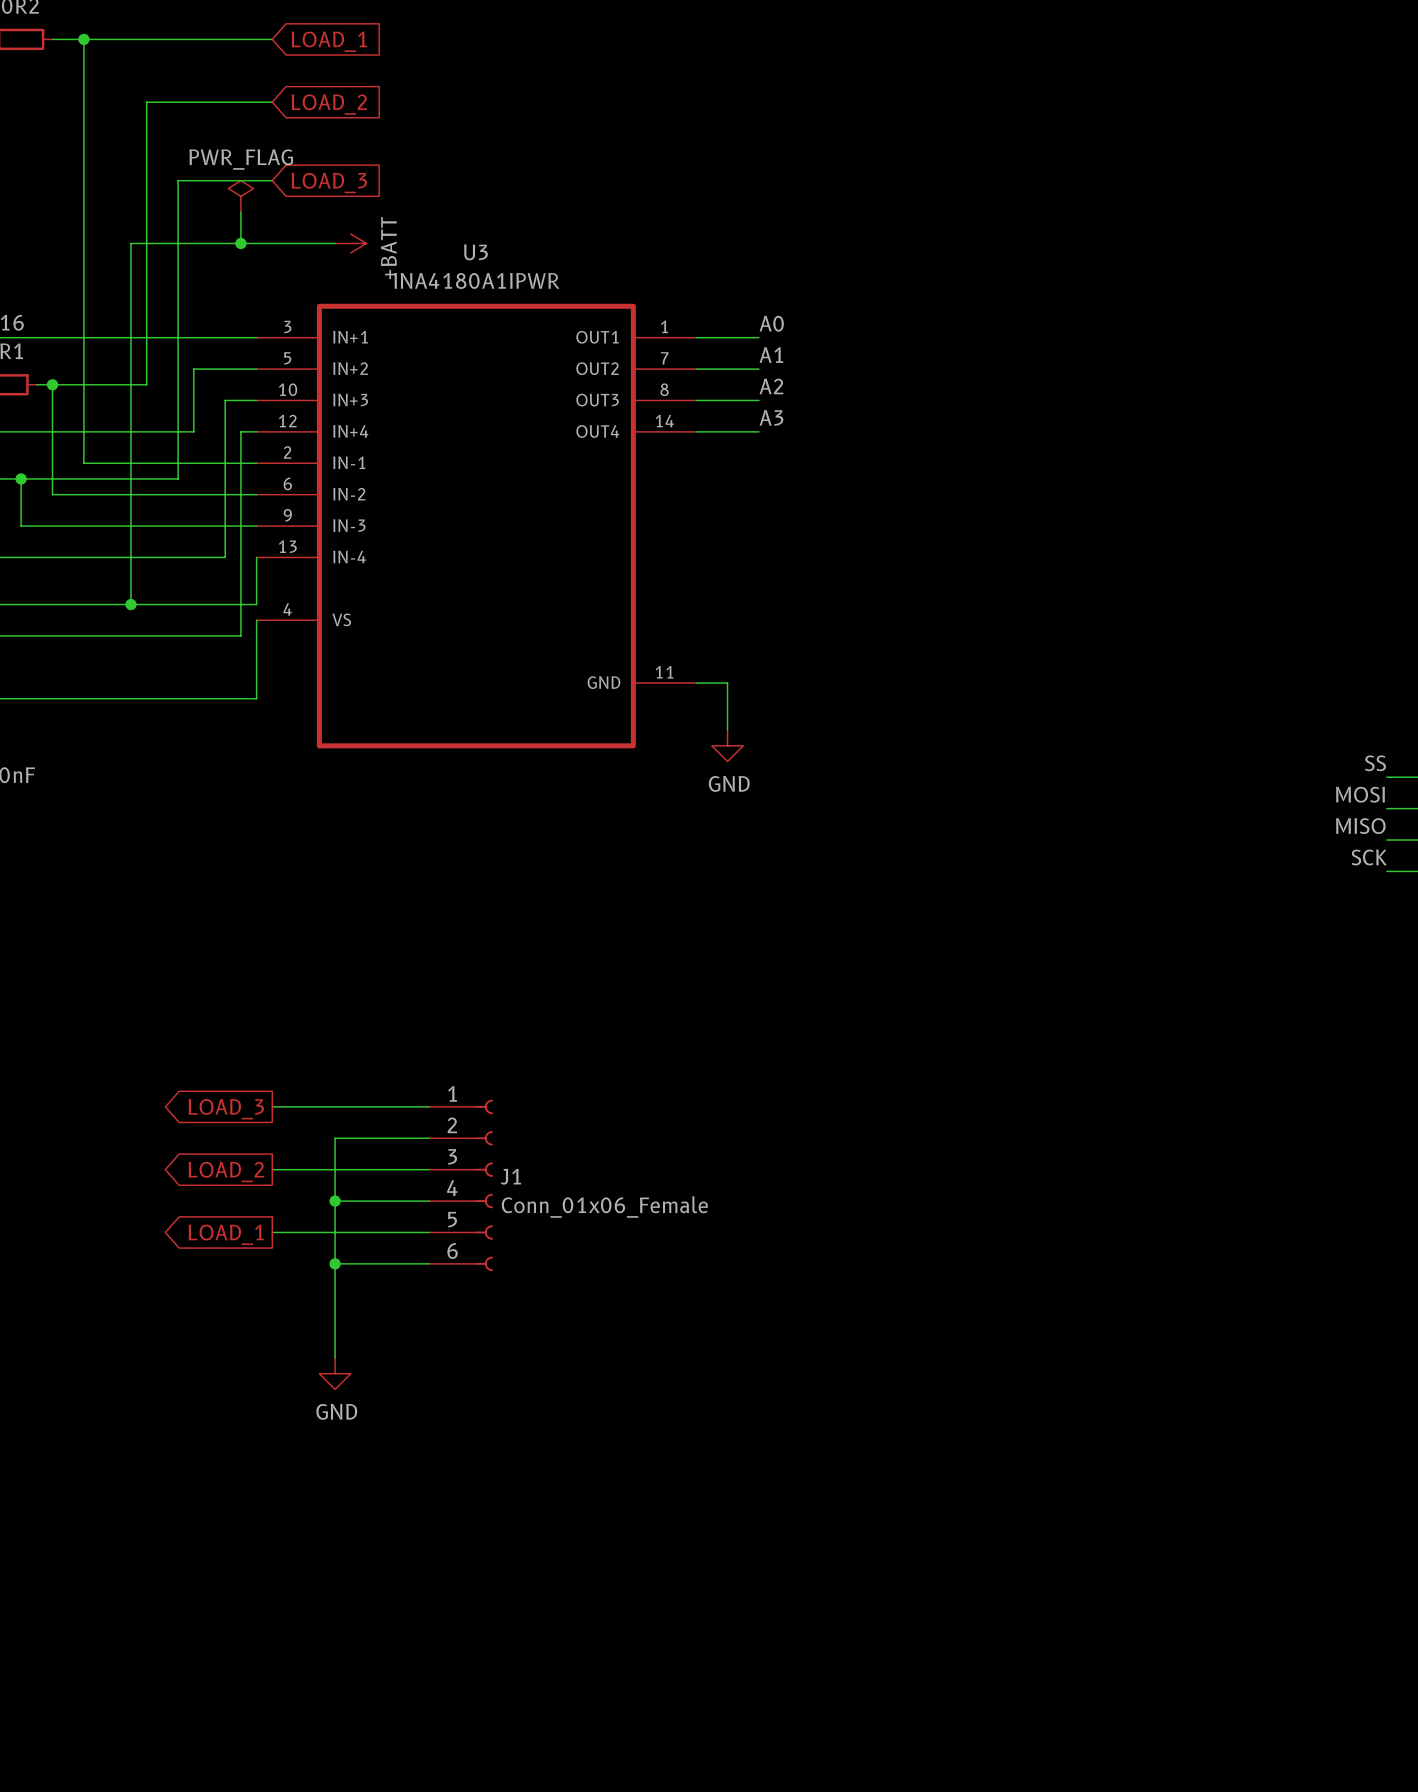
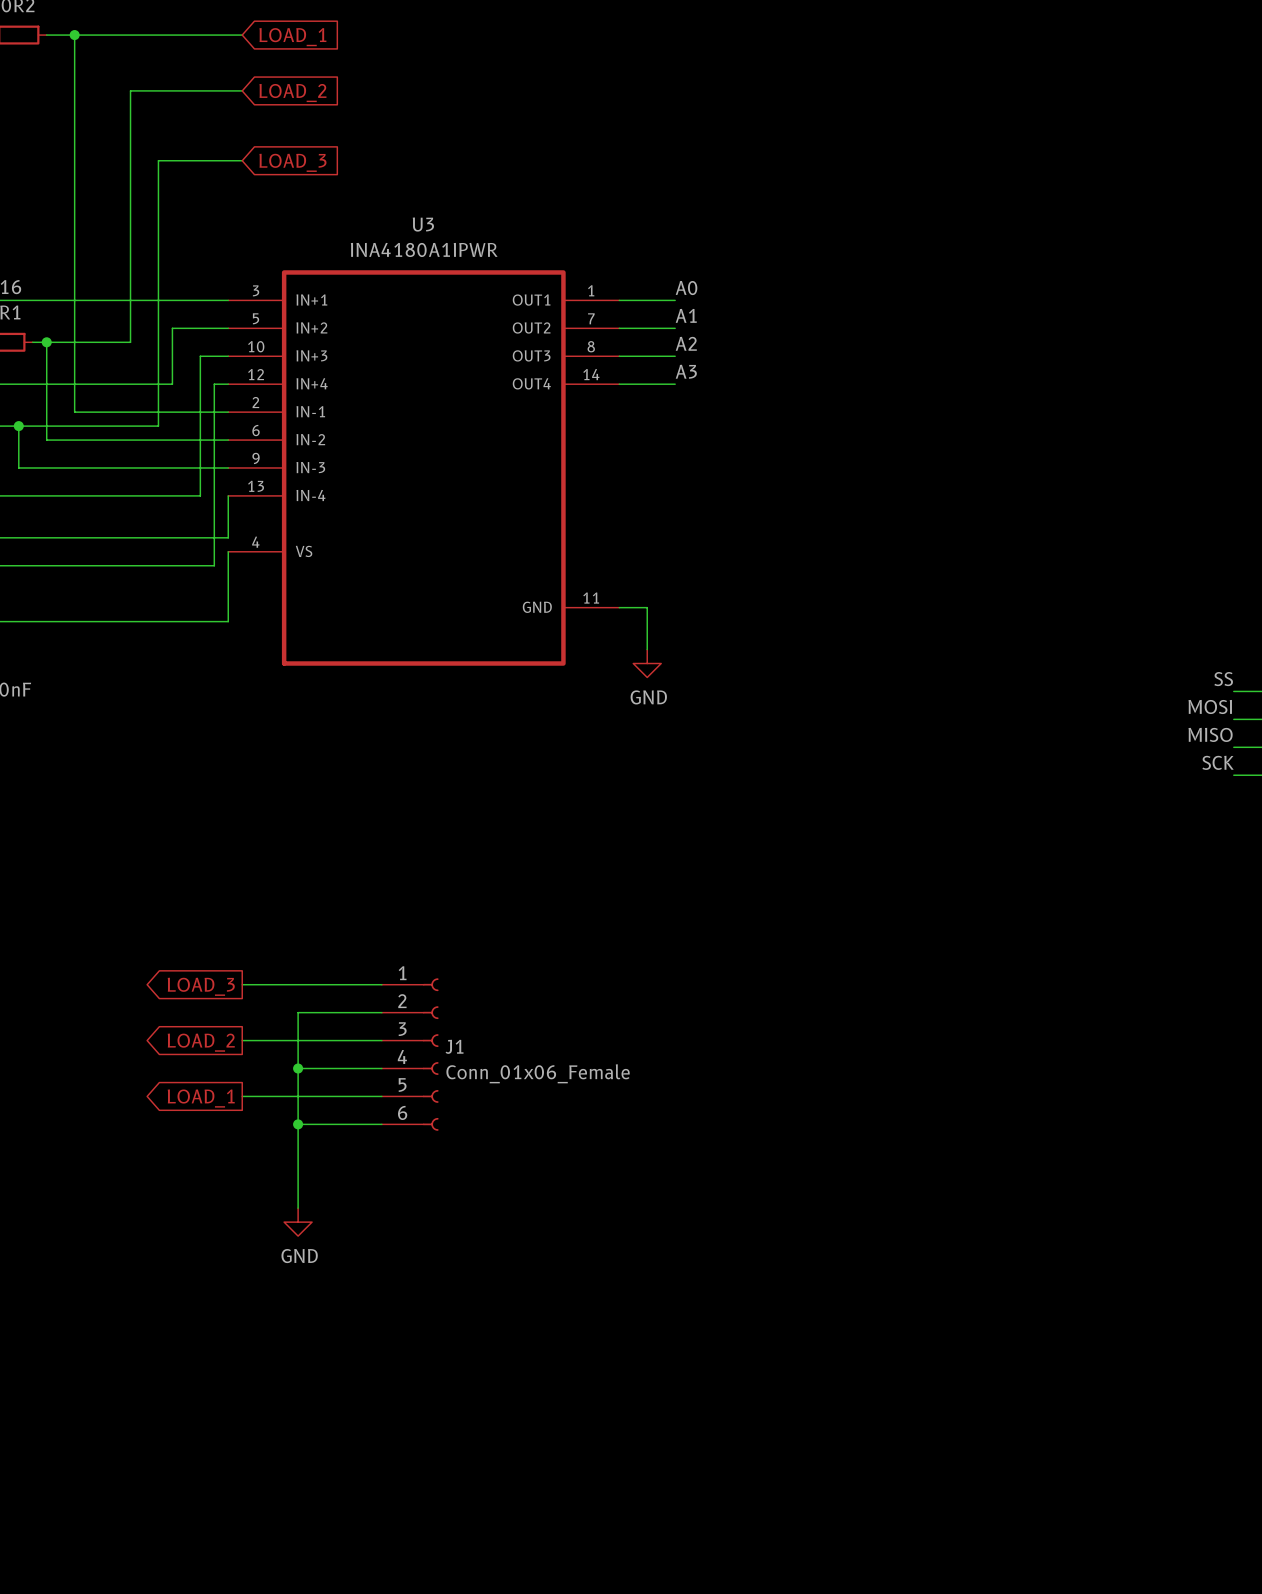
power symbol: PWR_FLAG (240, 196) -> none
wire: (240, 212) (240, 243) -> none
junction: (240, 243) -> none
wire: (335, 243) (131, 243) (131, 604) -> none
power symbol: +BATT (350, 243) -> none
junction: (131, 604) -> none

